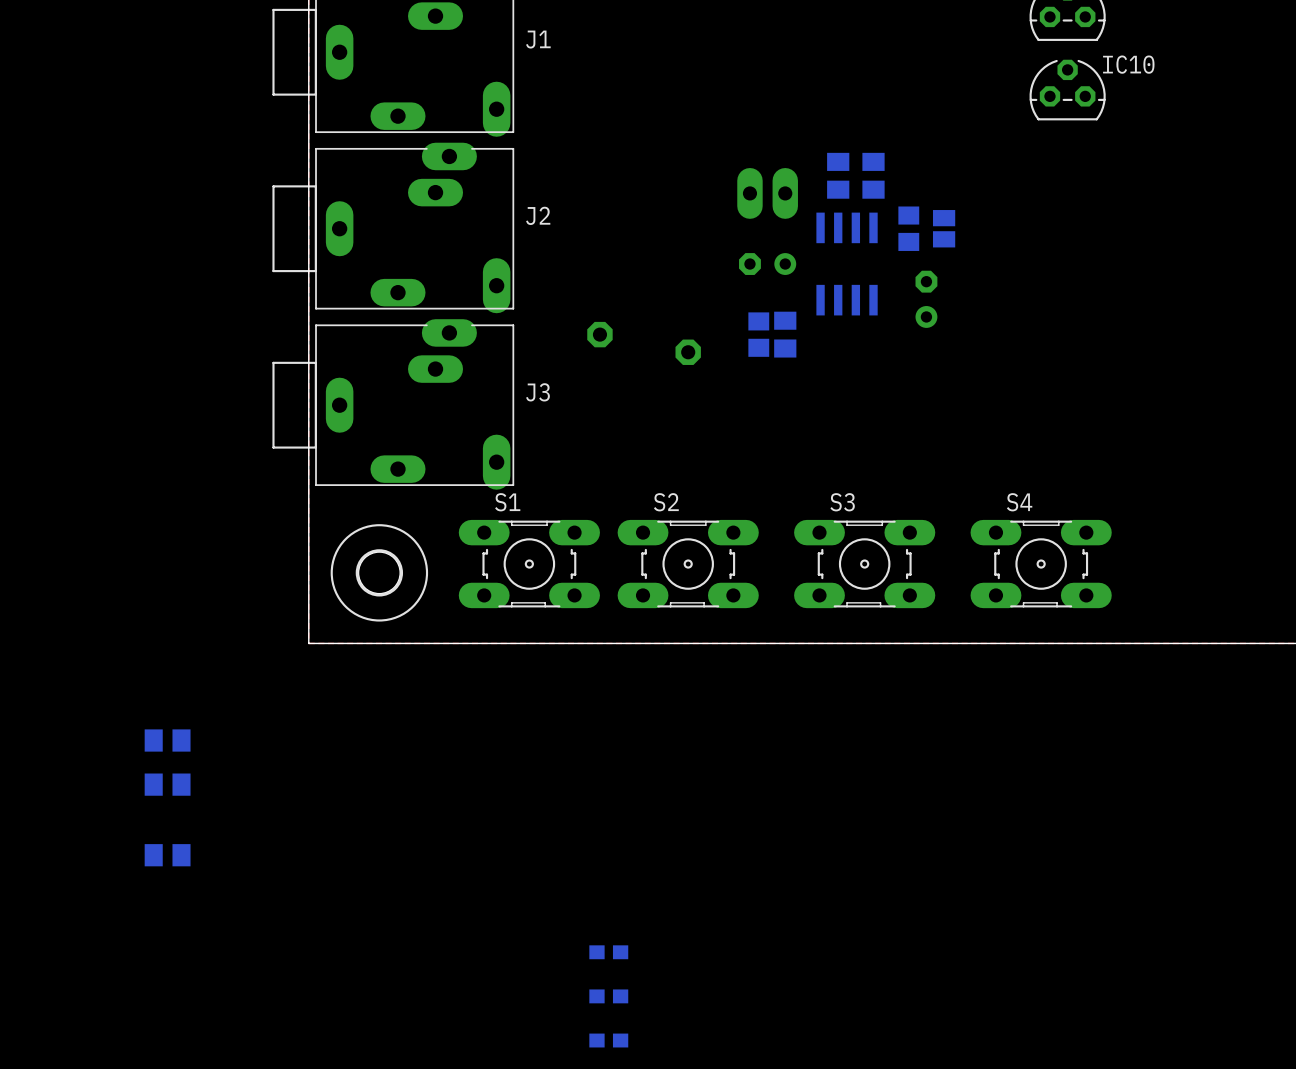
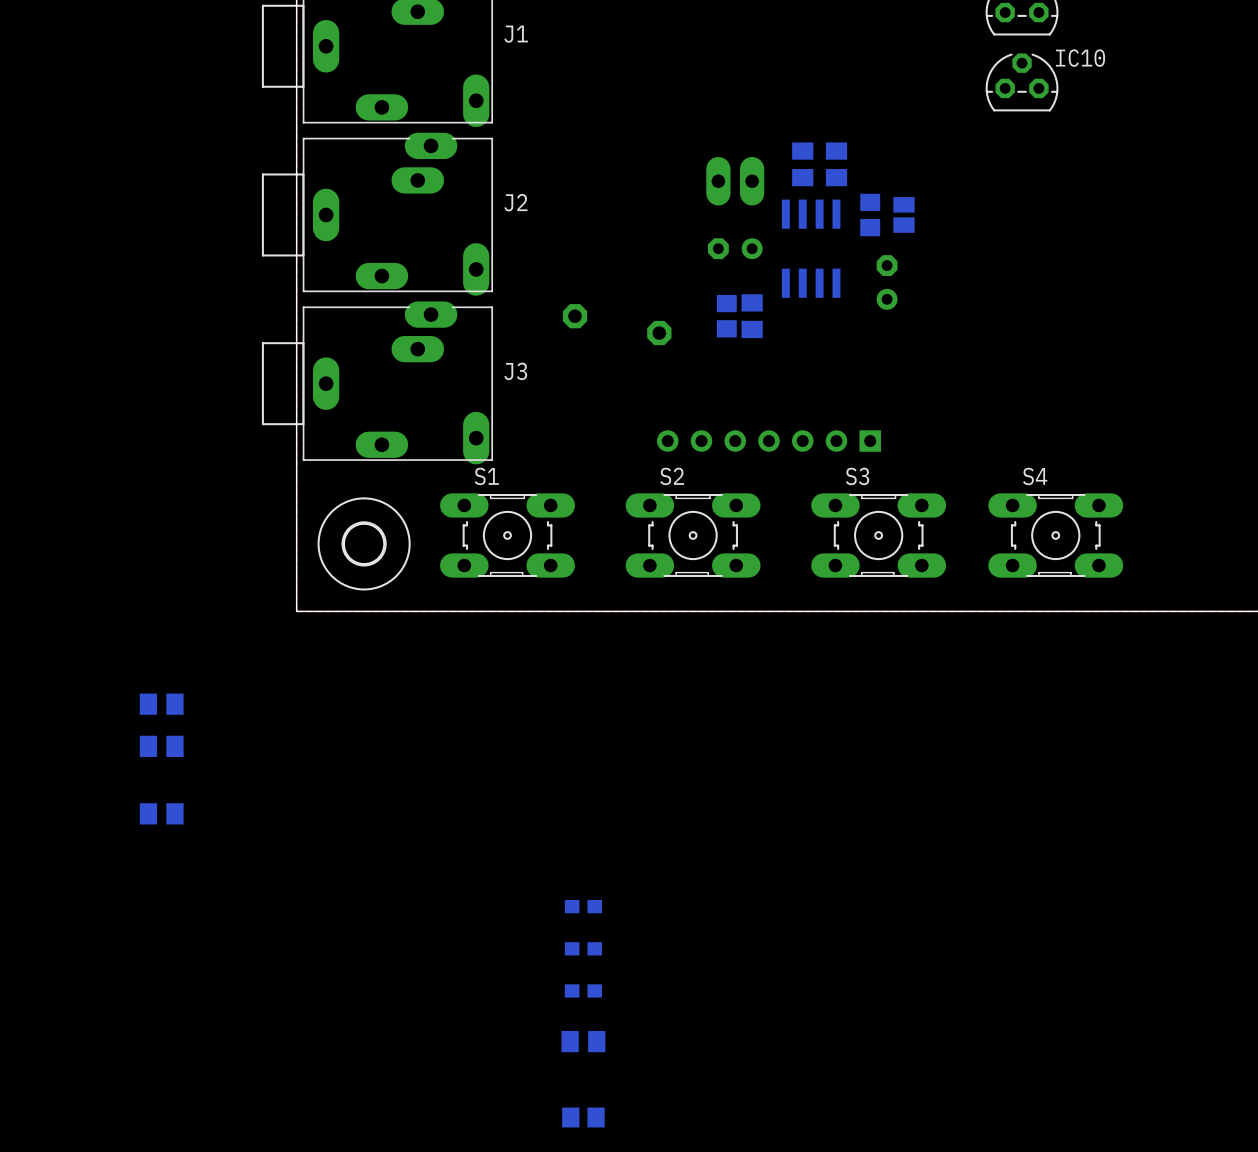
part: none -> (768, 441)
S2 position: (688, 564) -> (693, 535)
S3 position: (864, 564) -> (878, 535)
S4 position: (1041, 564) -> (1055, 535)

